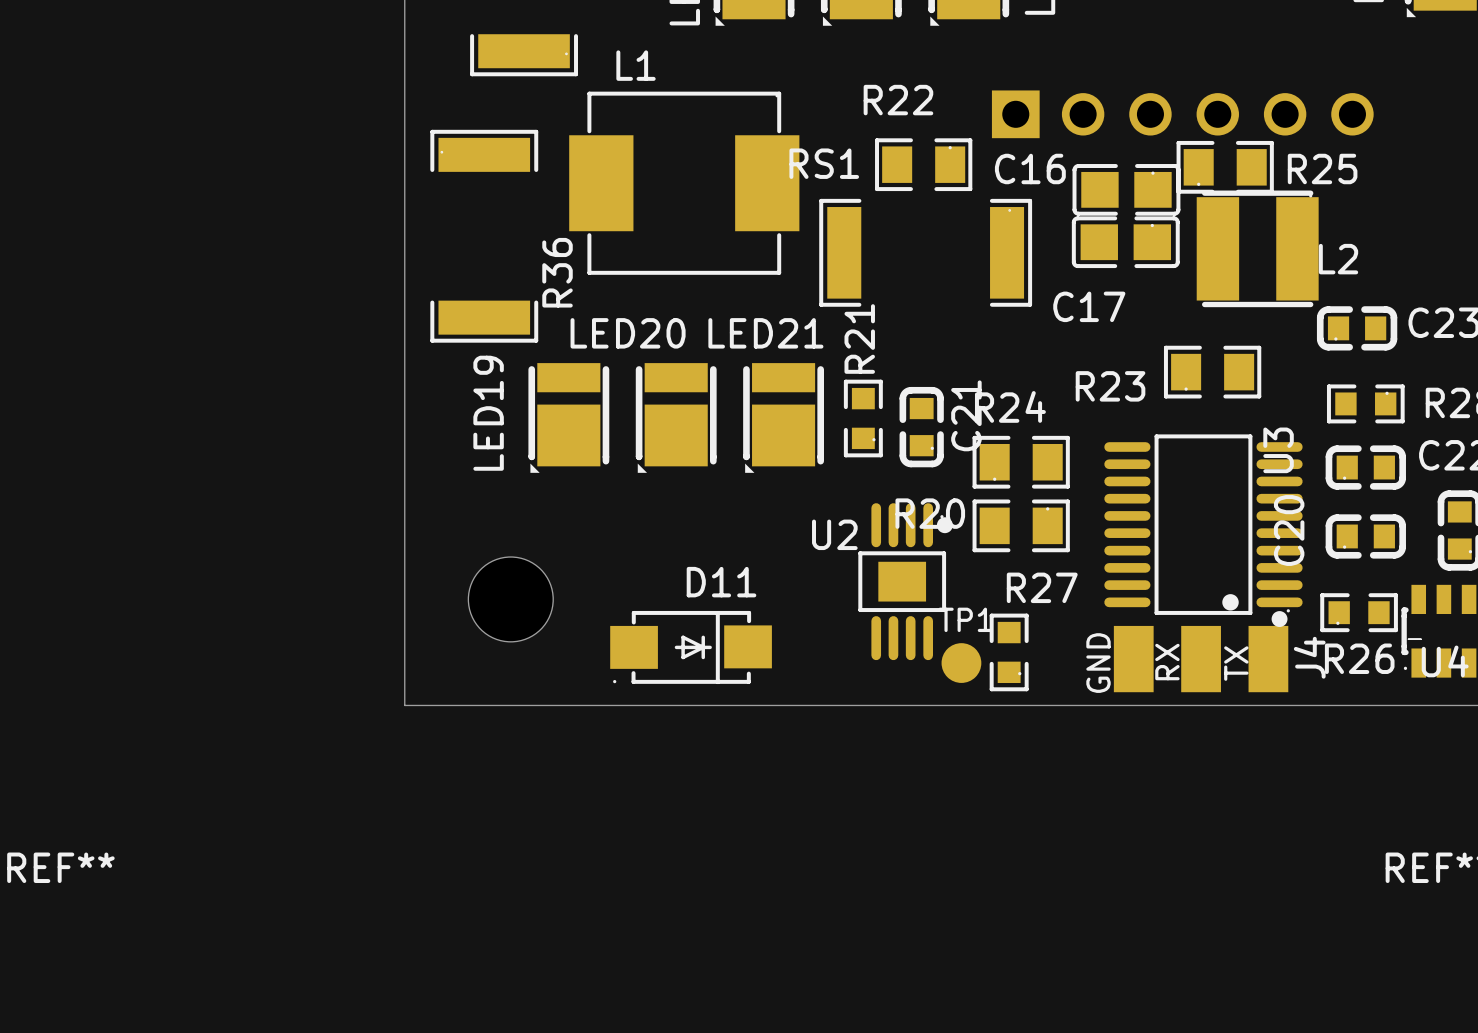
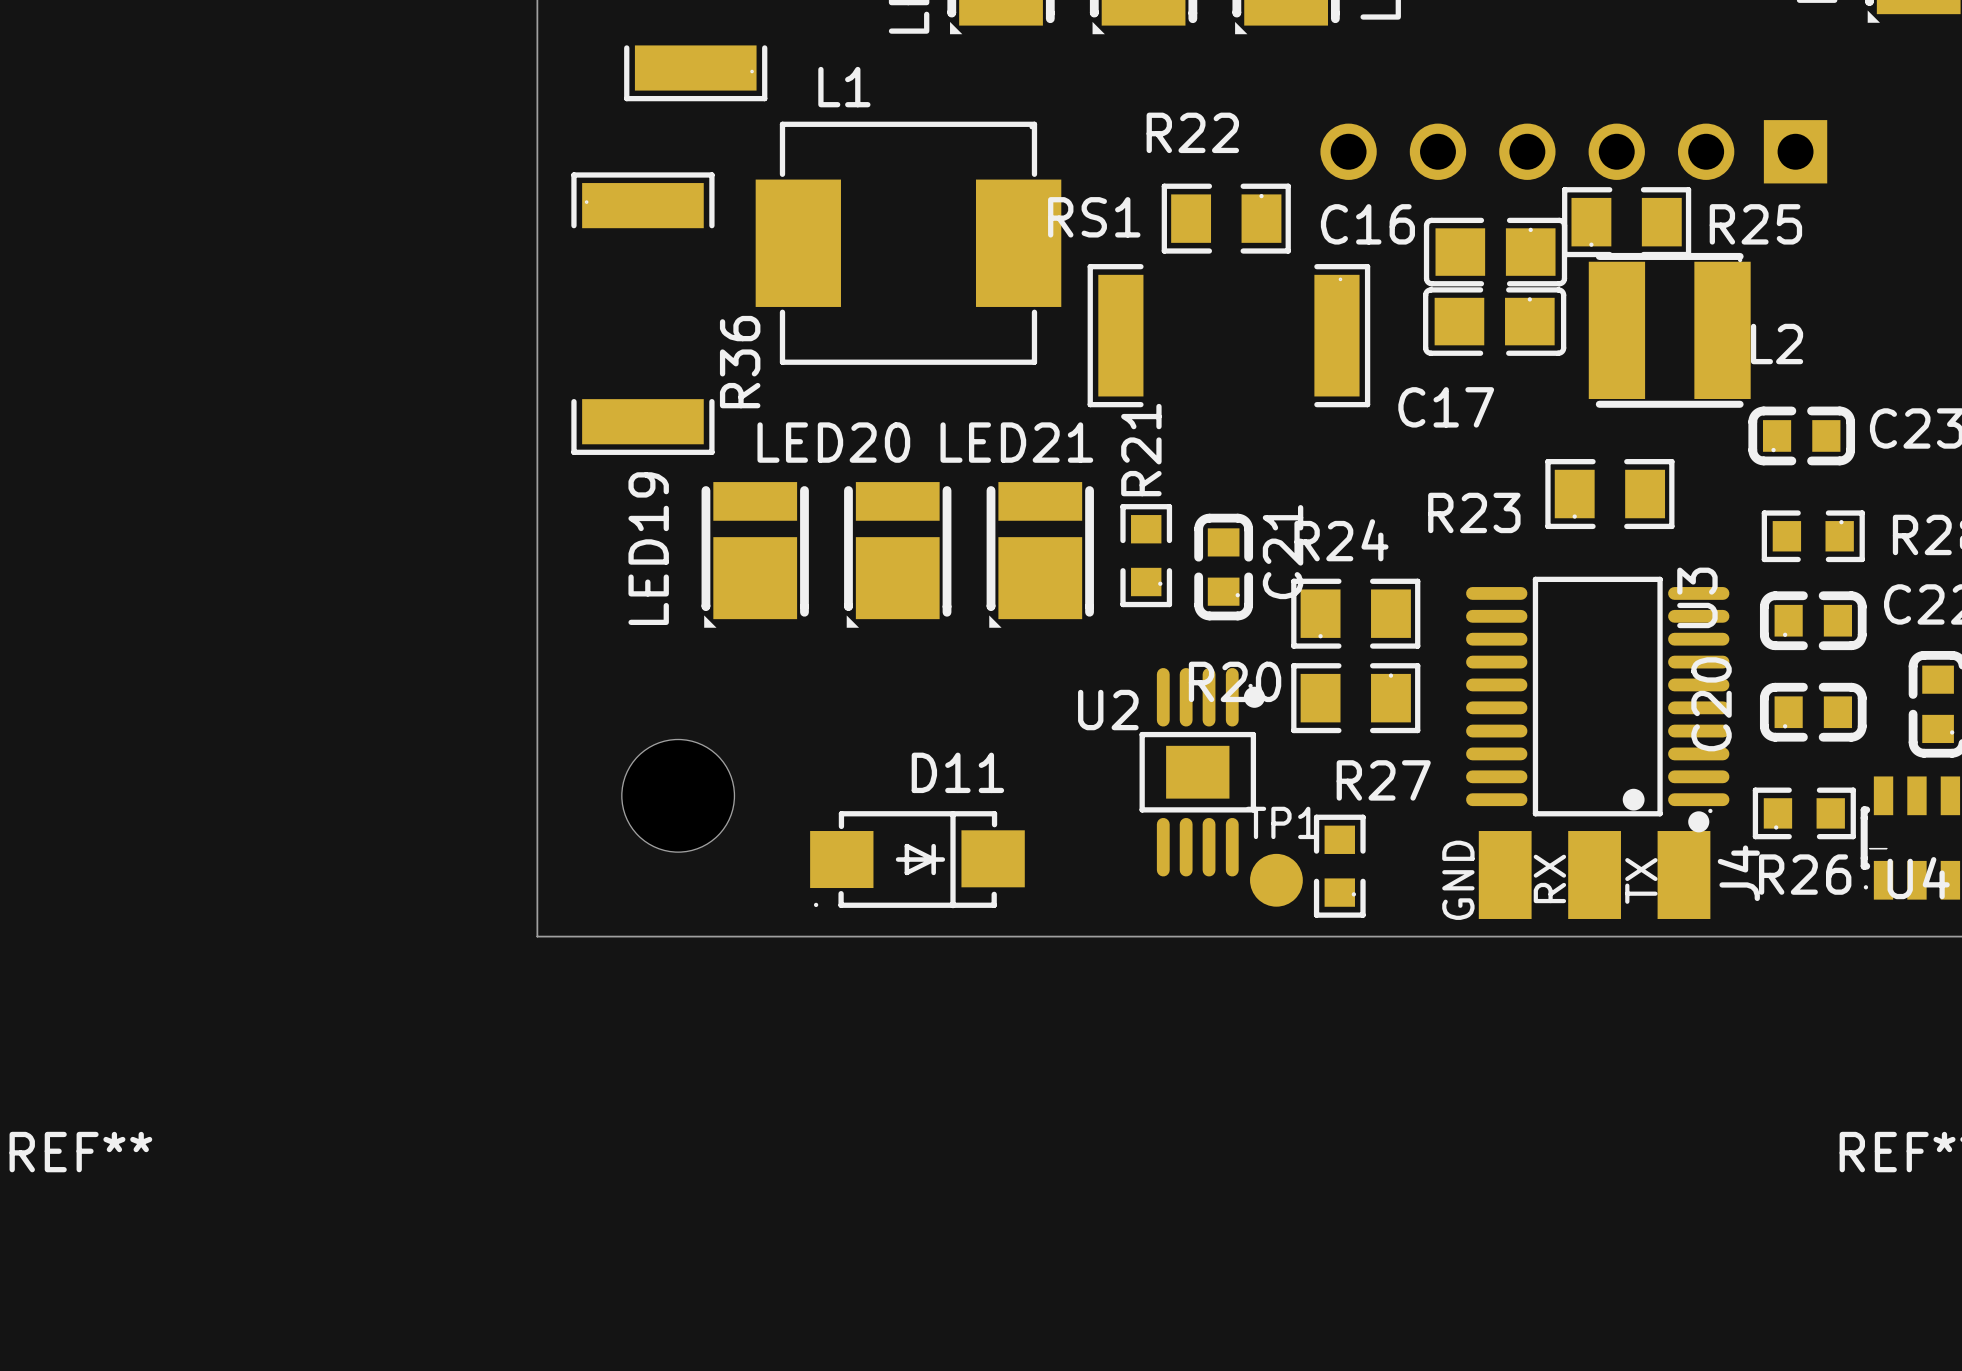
part rotation: 0° (1182, 114) -> 180° (1573, 151)

